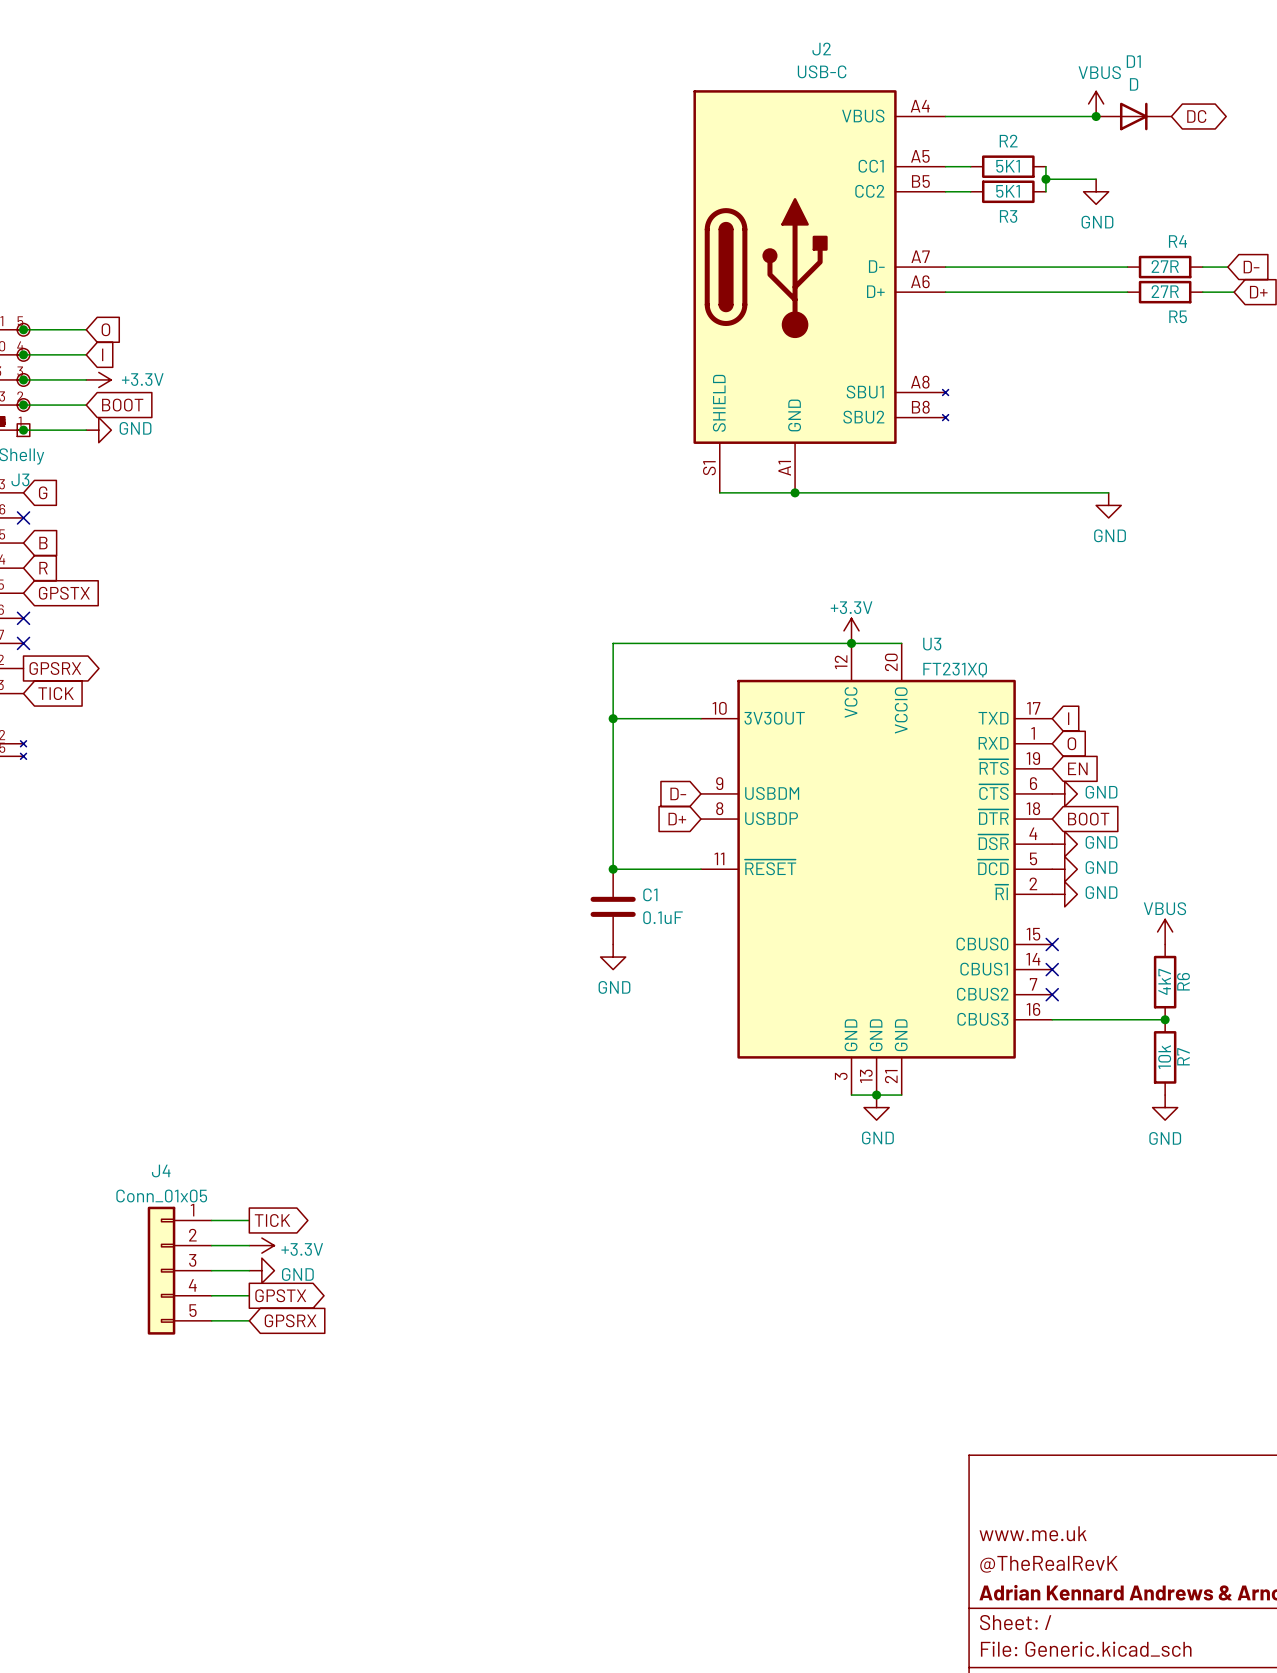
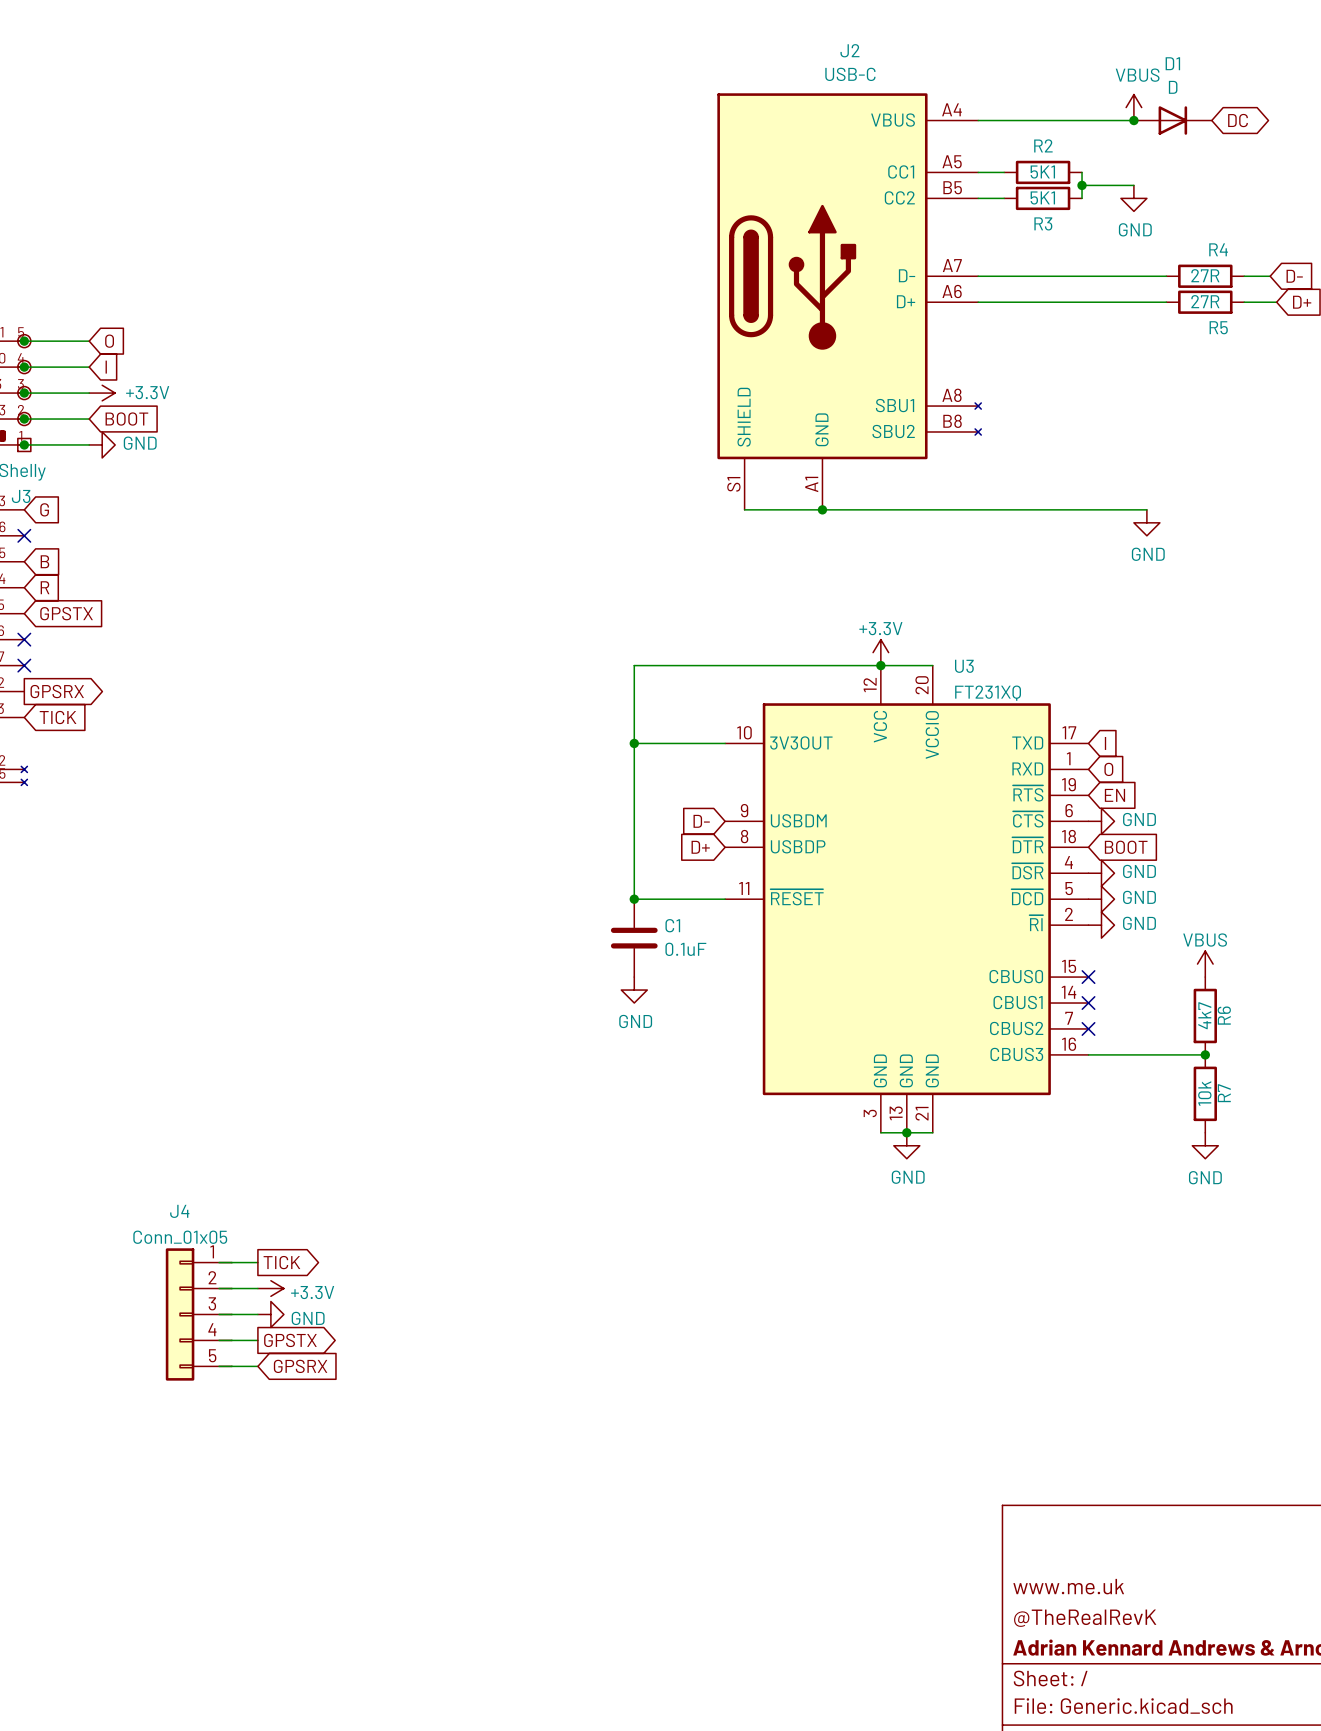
J4 position: (179, 1270) -> (198, 1314)

